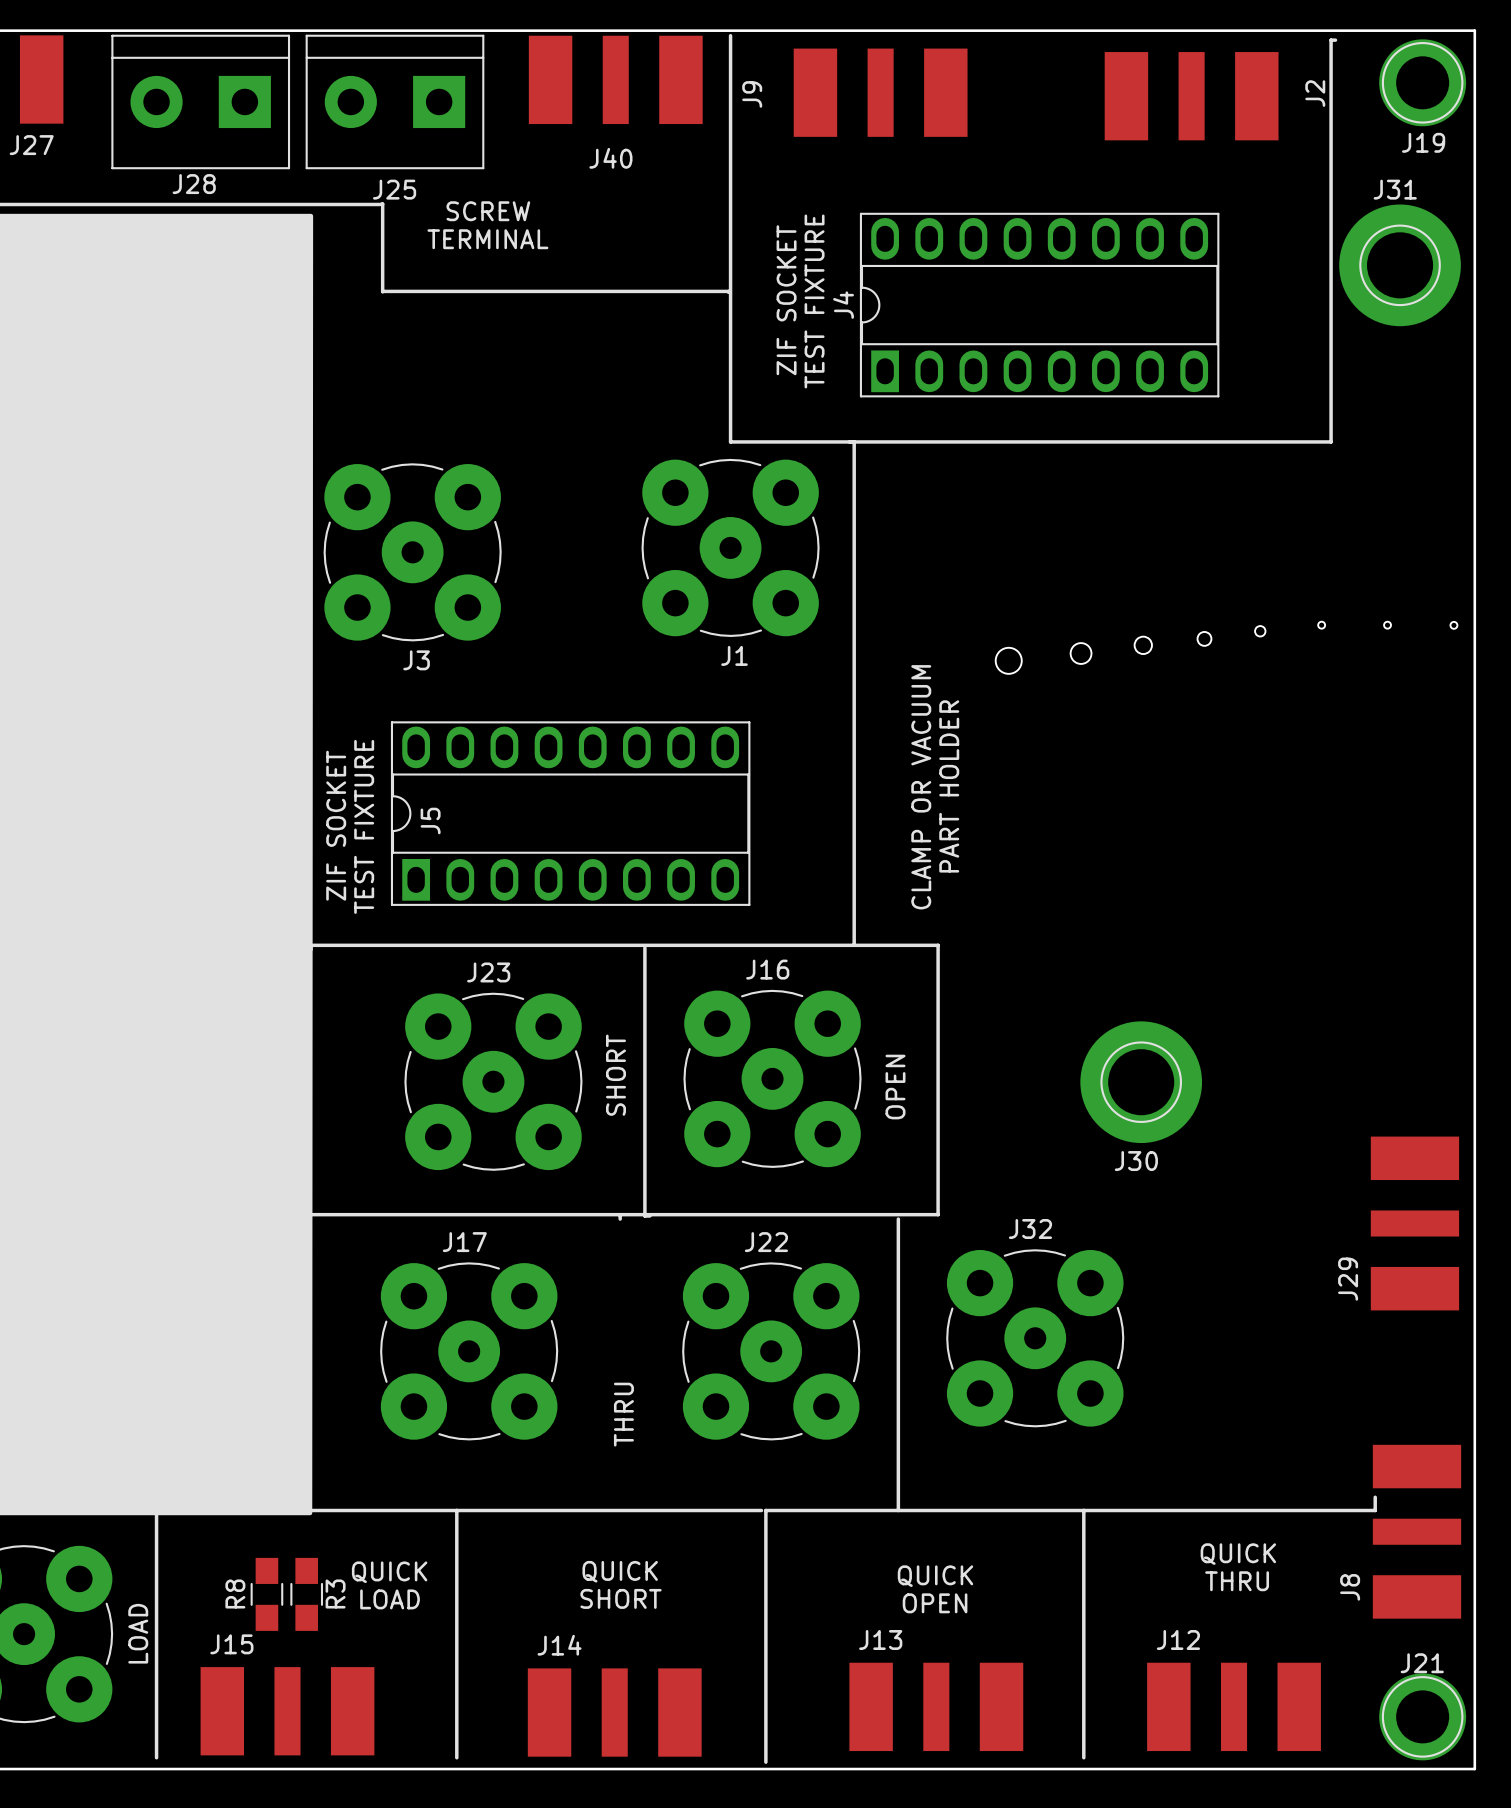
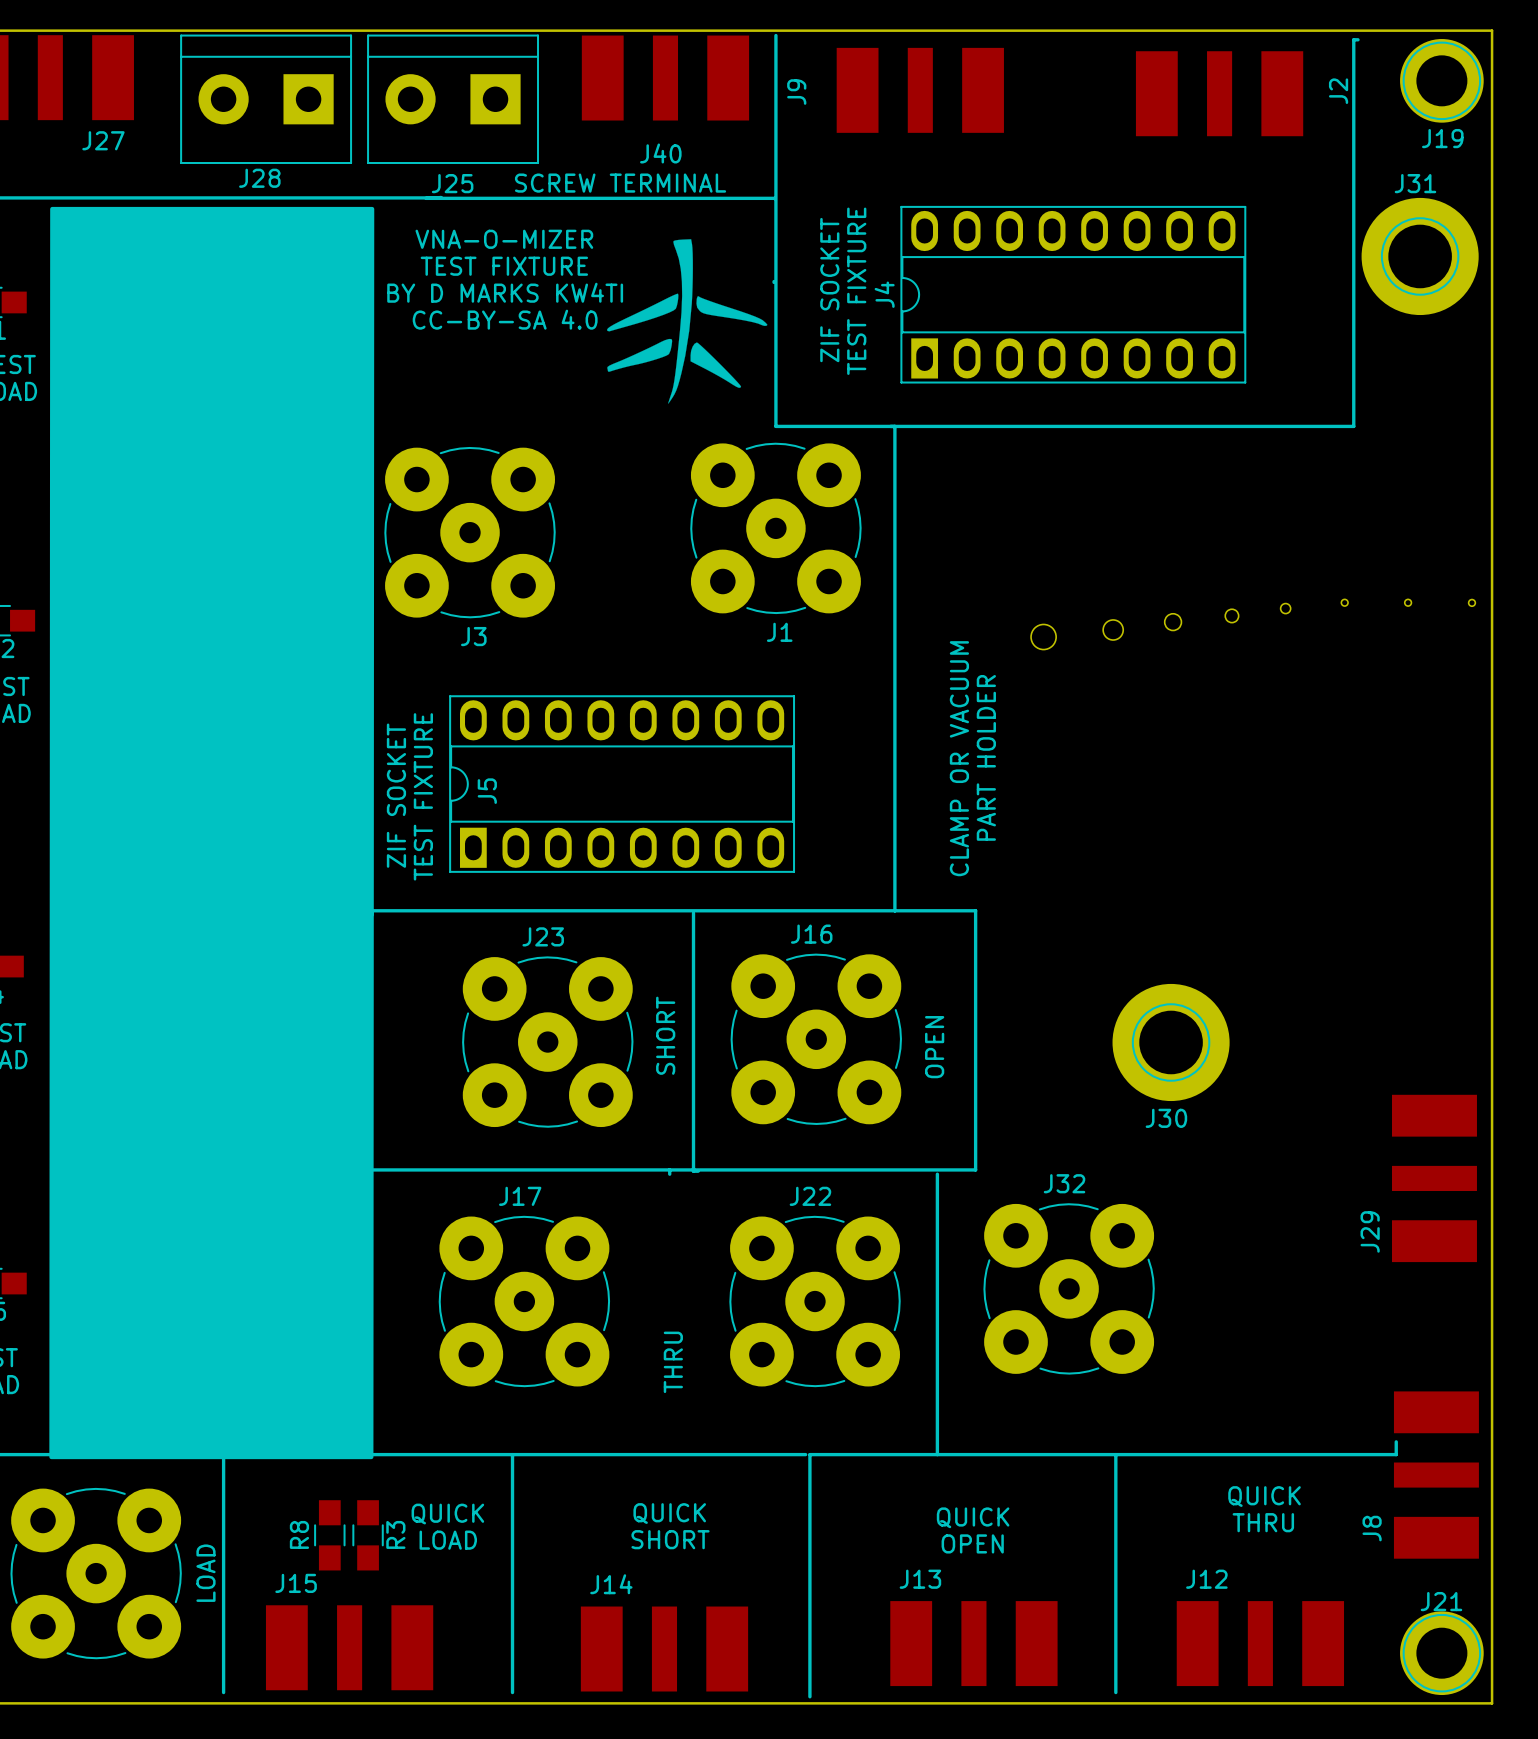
text: none -> SCREW TERMINAL (620, 183)
line: none -> (426, 198) (775, 198)
line: (382, 204) (382, 291) -> none
text: SCREW (488, 211) -> none
text: TERMINAL (487, 239) -> none
text: none -> VNA-O-MIZER (504, 239)
drawing: none -> [607, 239, 768, 404]
text: none -> TEST FIXTURE (504, 266)
line: (382, 291) (728, 291) -> none
text: none -> BY D MARKS KW4TI (505, 292)
text: none -> CC-BY-SA 4.0 (505, 319)

